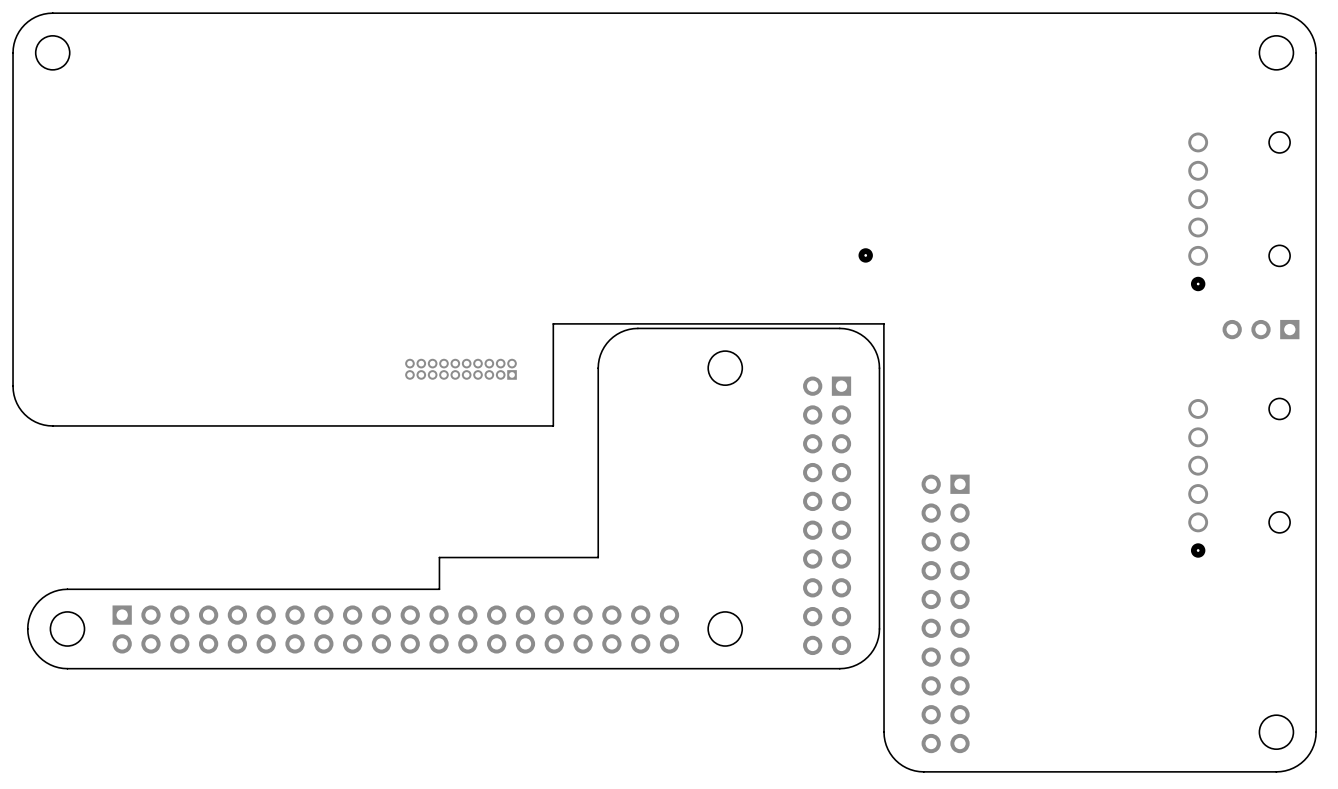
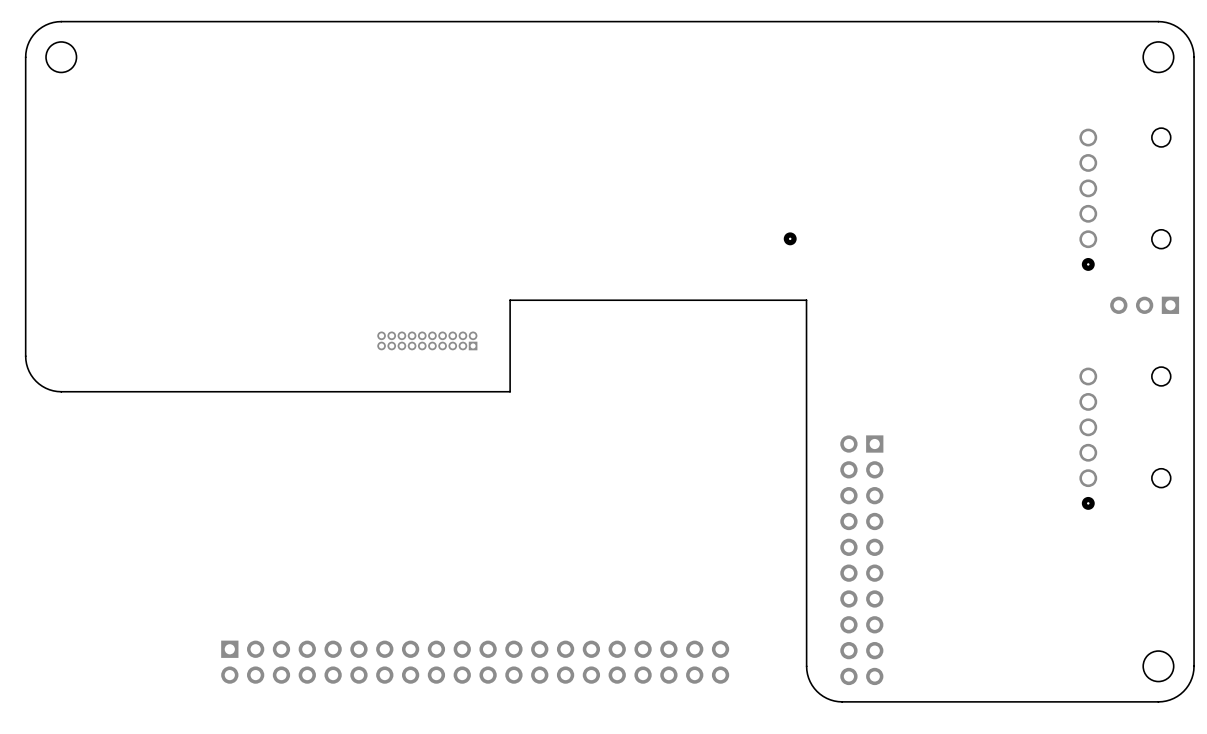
board edge: (839, 328) (637, 328) (620, 332) (609, 340) (600, 355) (598, 368) (598, 557) (439, 557) (439, 589) (63, 589) (46, 595) (33, 607) (28, 624) (29, 642) (42, 660) (54, 666) (67, 668) (839, 668) (852, 666) (870, 653) (879, 633) (879, 368) (877, 355) (867, 340) (852, 330) (839, 328) -> none
round board edge: [707, 350, 743, 386] -> none
part: (827, 515) -> none
round board edge: [50, 611, 85, 647] -> none
round board edge: [707, 611, 743, 647] -> none
part position: (395, 629) -> (475, 662)

